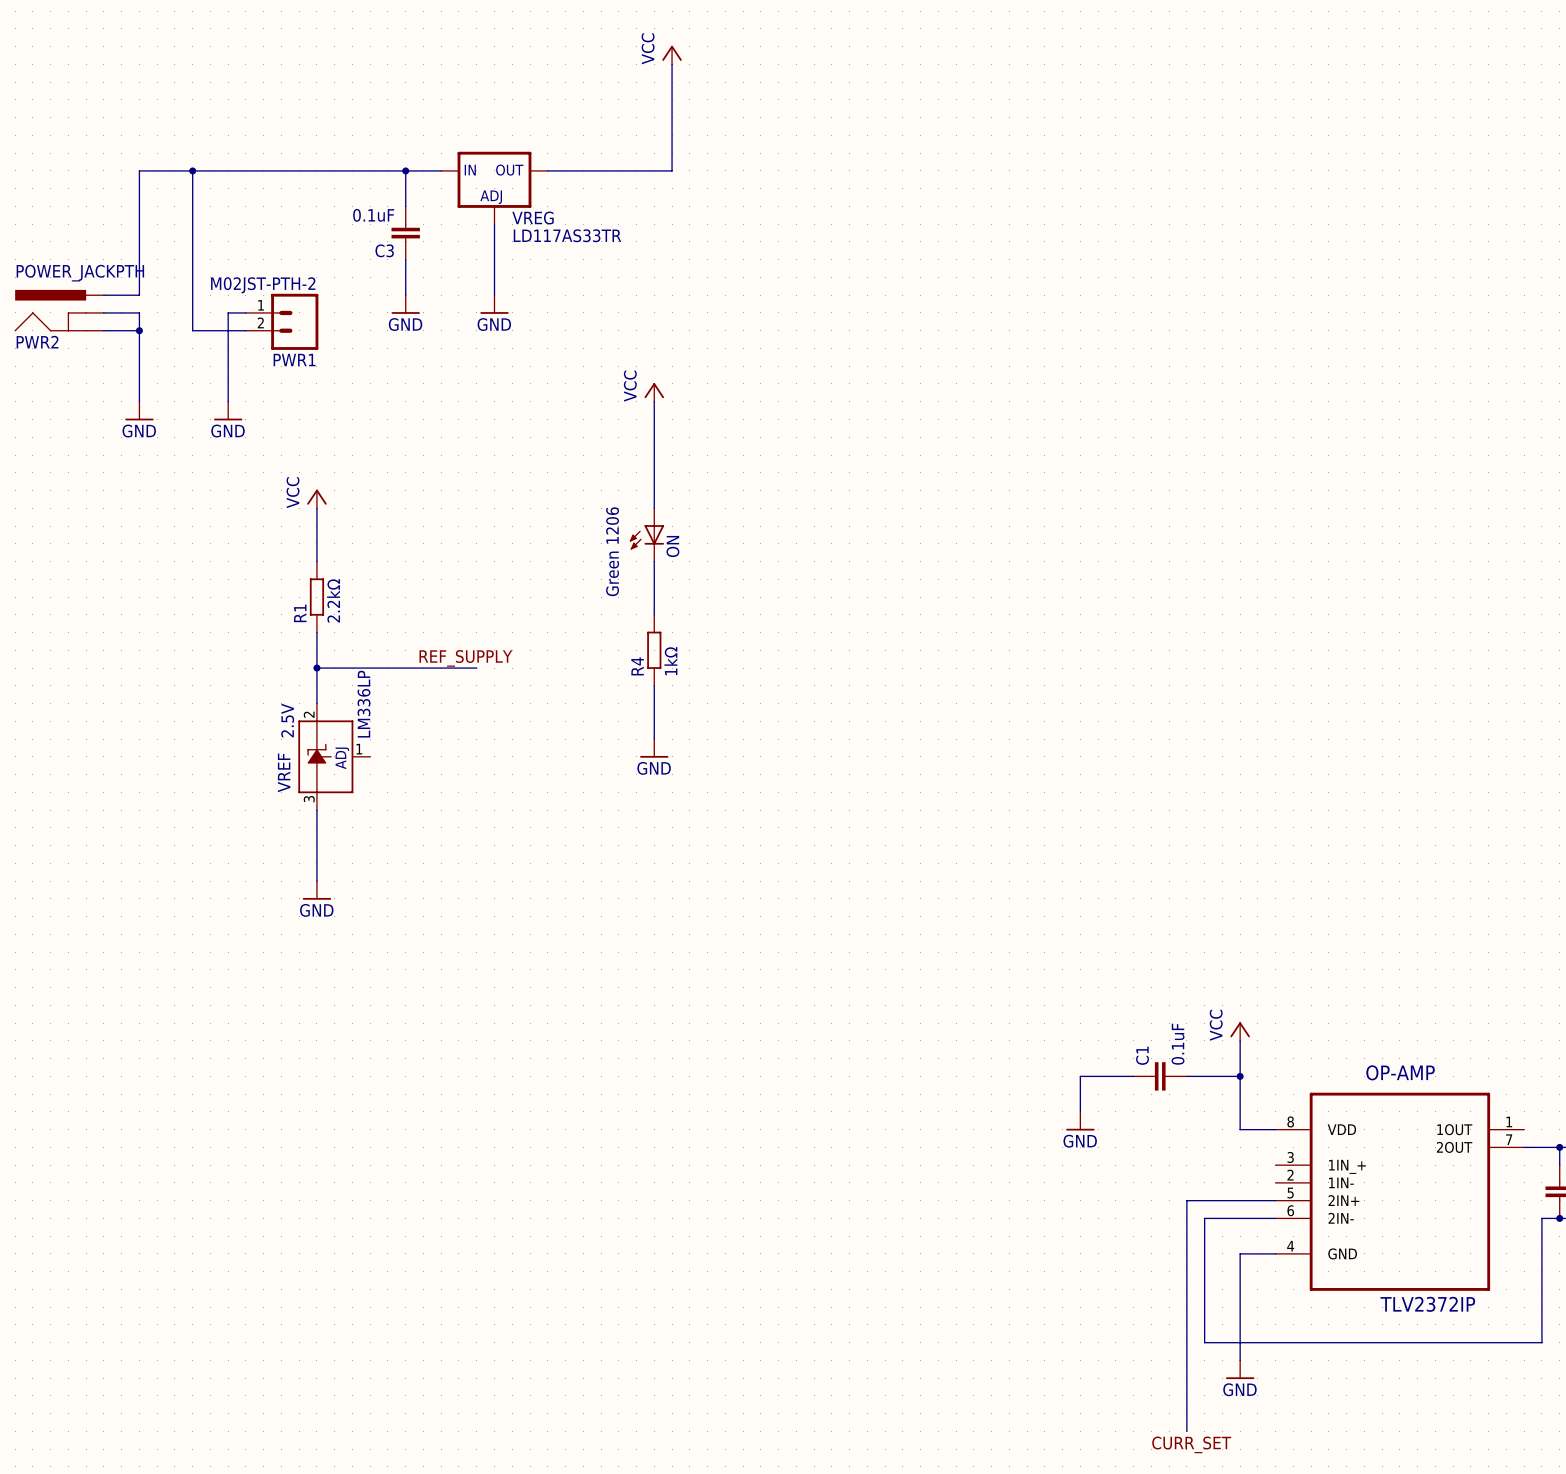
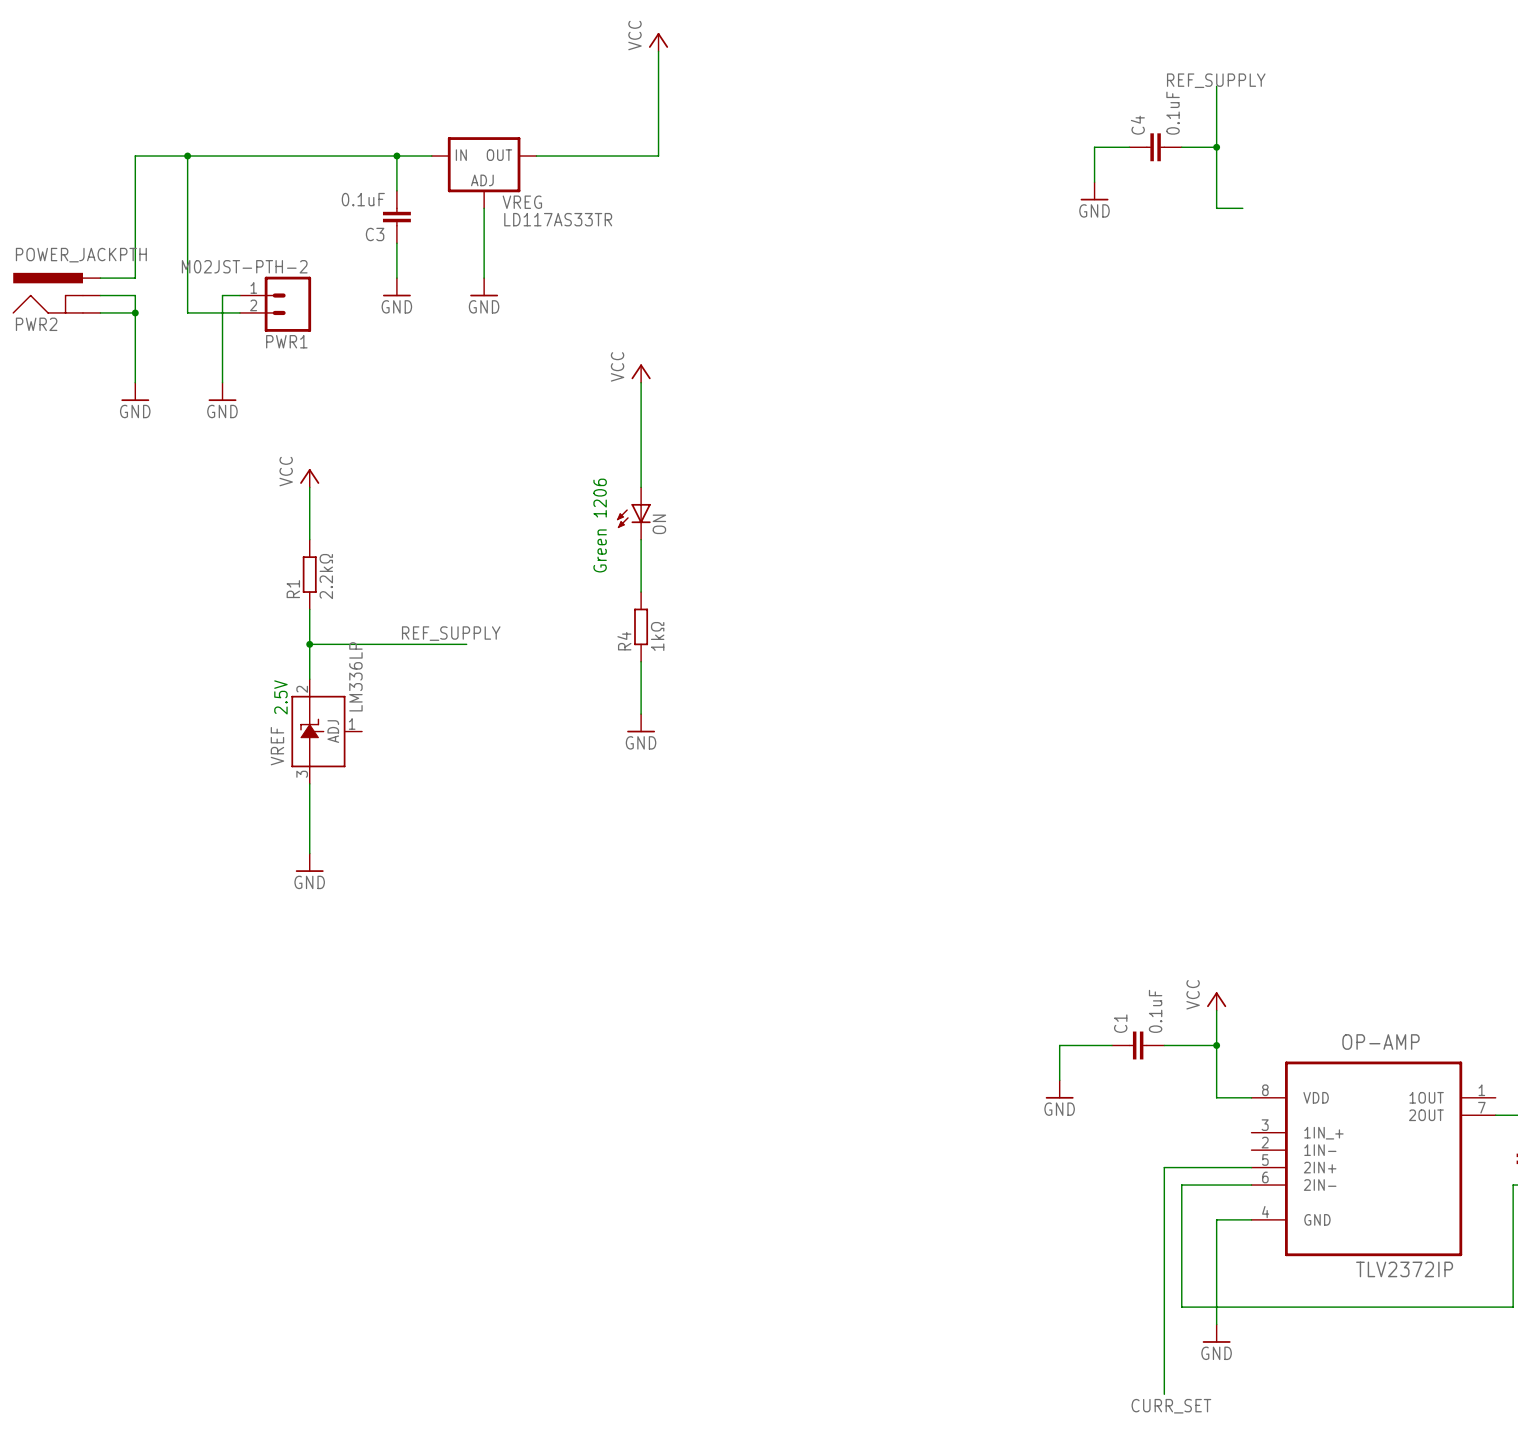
label: none -> REF_SUPPLY (1216, 80)
wire: none -> (1216, 86) (1216, 208) (1242, 208)
wire: none -> (1129, 147) (1094, 147) (1094, 182)
C4: none -> 0.1uF (1155, 147)
wire: none -> (1181, 147) (1216, 147)
junction: none -> (1216, 147)
power symbol: none -> GND (1094, 191)

